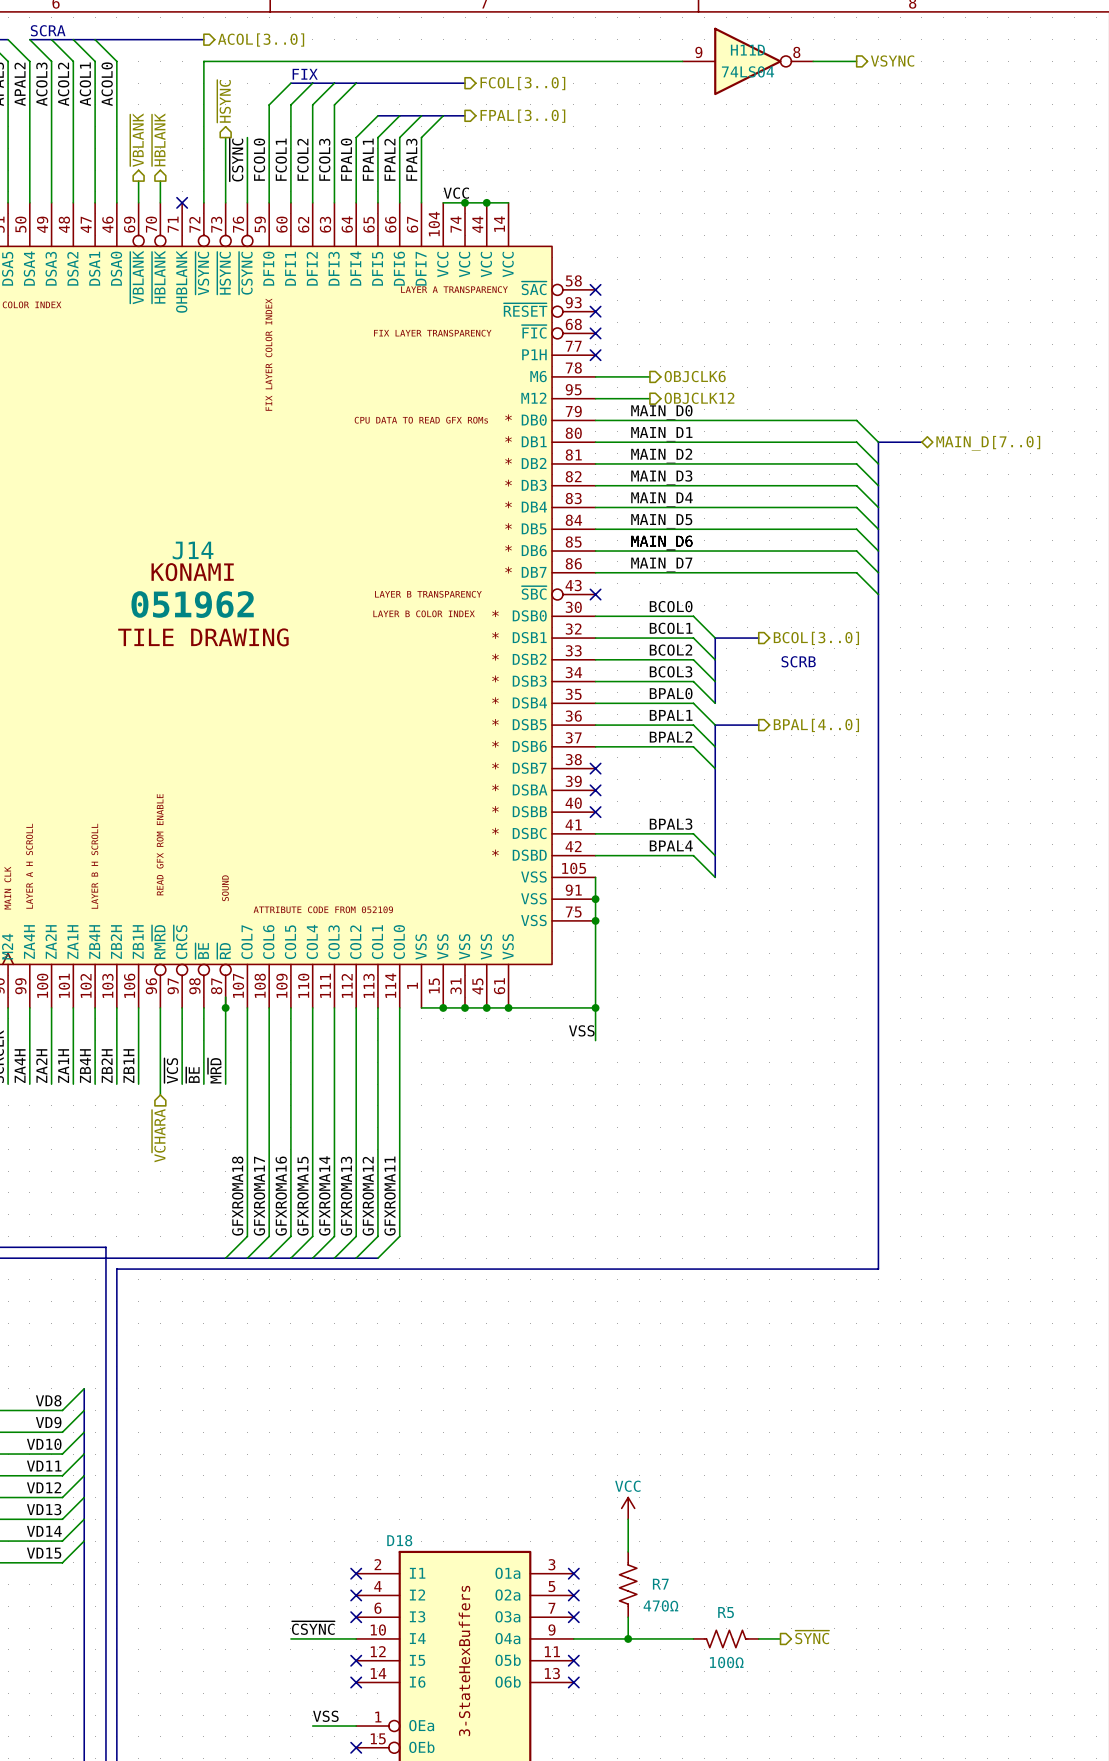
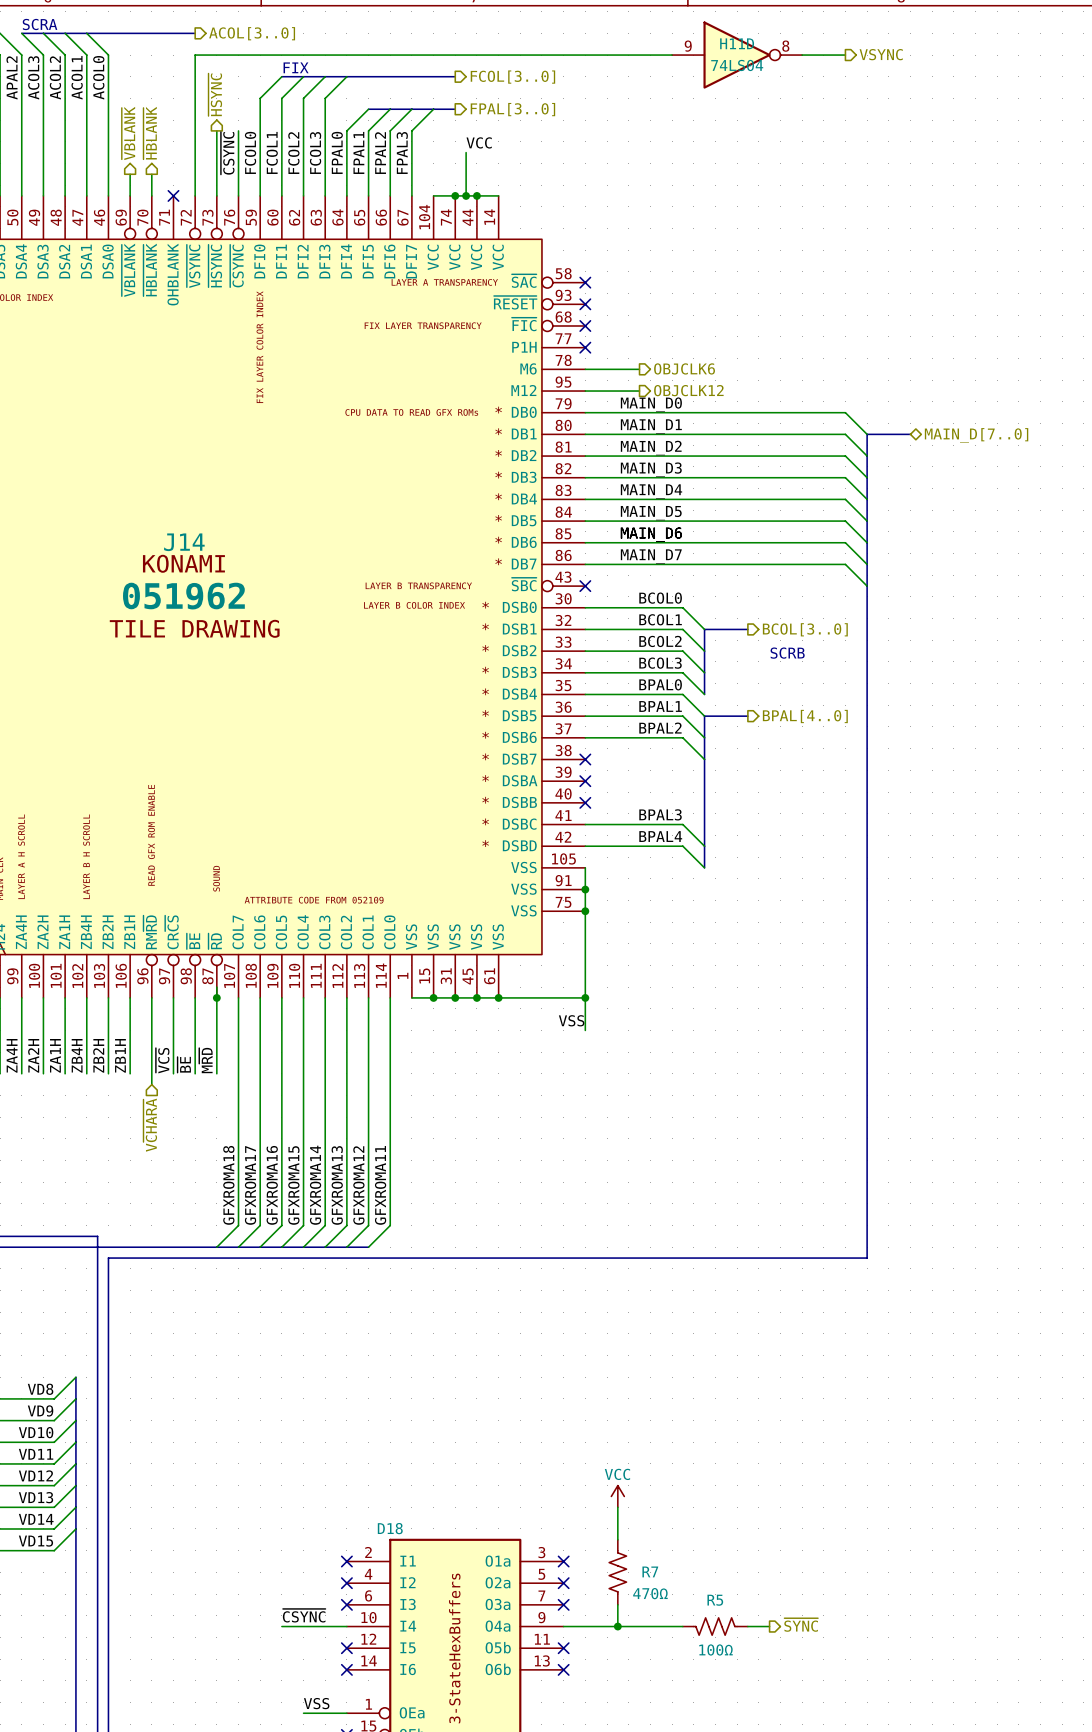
wire: none -> (466, 152) (466, 195)
label position: VCC (456, 193) -> VCC (479, 142)
junction: none -> (466, 195)

